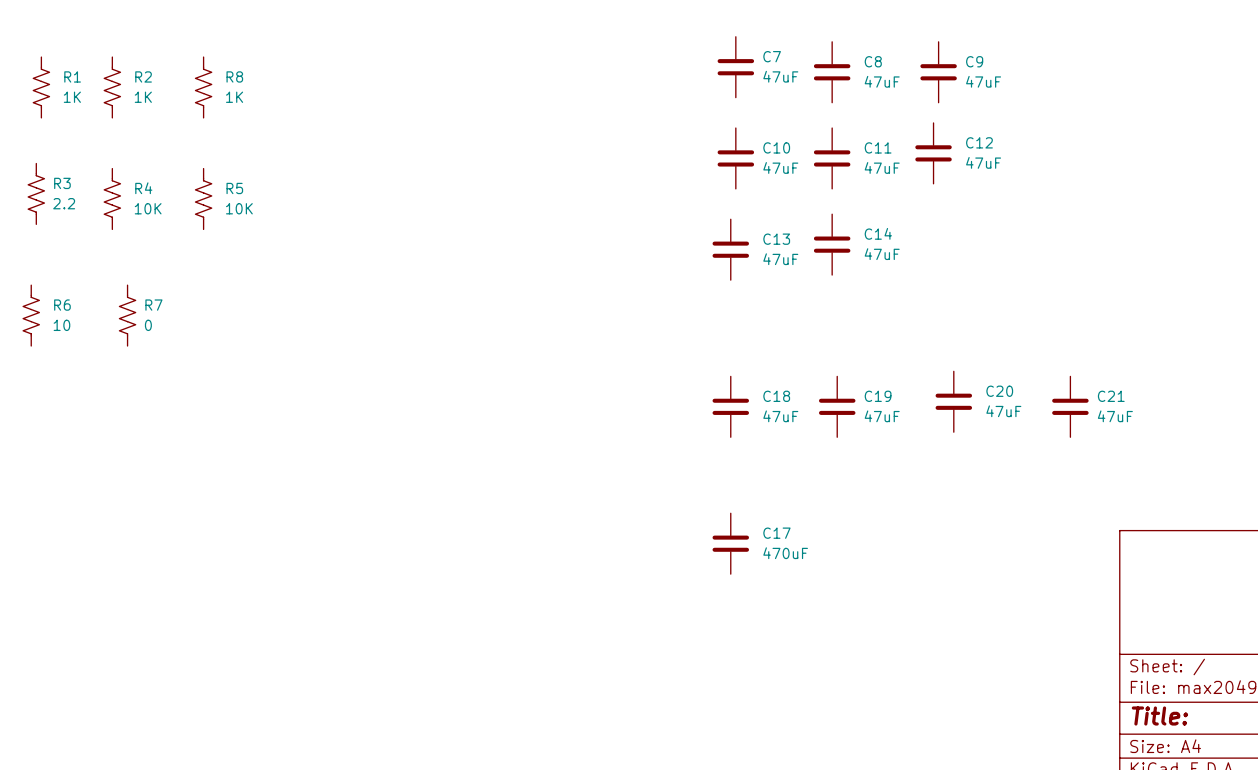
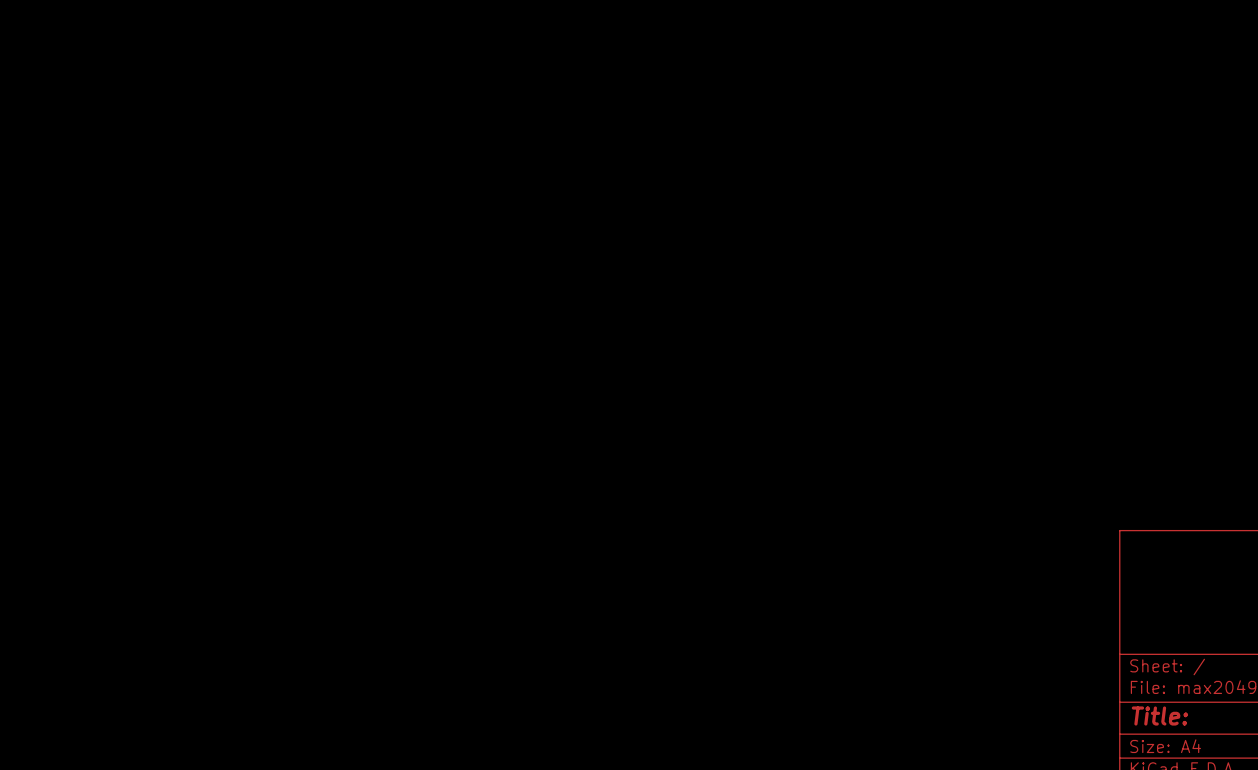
C7: 47uF (735, 67) -> none
C8: 47uF (832, 72) -> none
C9: 47uF (938, 72) -> none
R1: 1K (41, 87) -> none
R2: 1K (112, 87) -> none
R8: 1K (203, 87) -> none
C12: 47uF (933, 153) -> none
C10: 47uF (735, 158) -> none
C11: 47uF (832, 158) -> none
R3: 2.2 (36, 193) -> none
R4: 10K (112, 199) -> none
R5: 10K (203, 199) -> none
C14: 47uF (832, 244) -> none
C13: 47uF (730, 249) -> none
R6: 10 (31, 315) -> none
R7: 0 (127, 315) -> none
C20: 47uF (953, 401) -> none
C18: 47uF (730, 406) -> none
C19: 47uF (837, 406) -> none
C21: 47uF (1070, 406) -> none
C17: 470uF (730, 543) -> none

